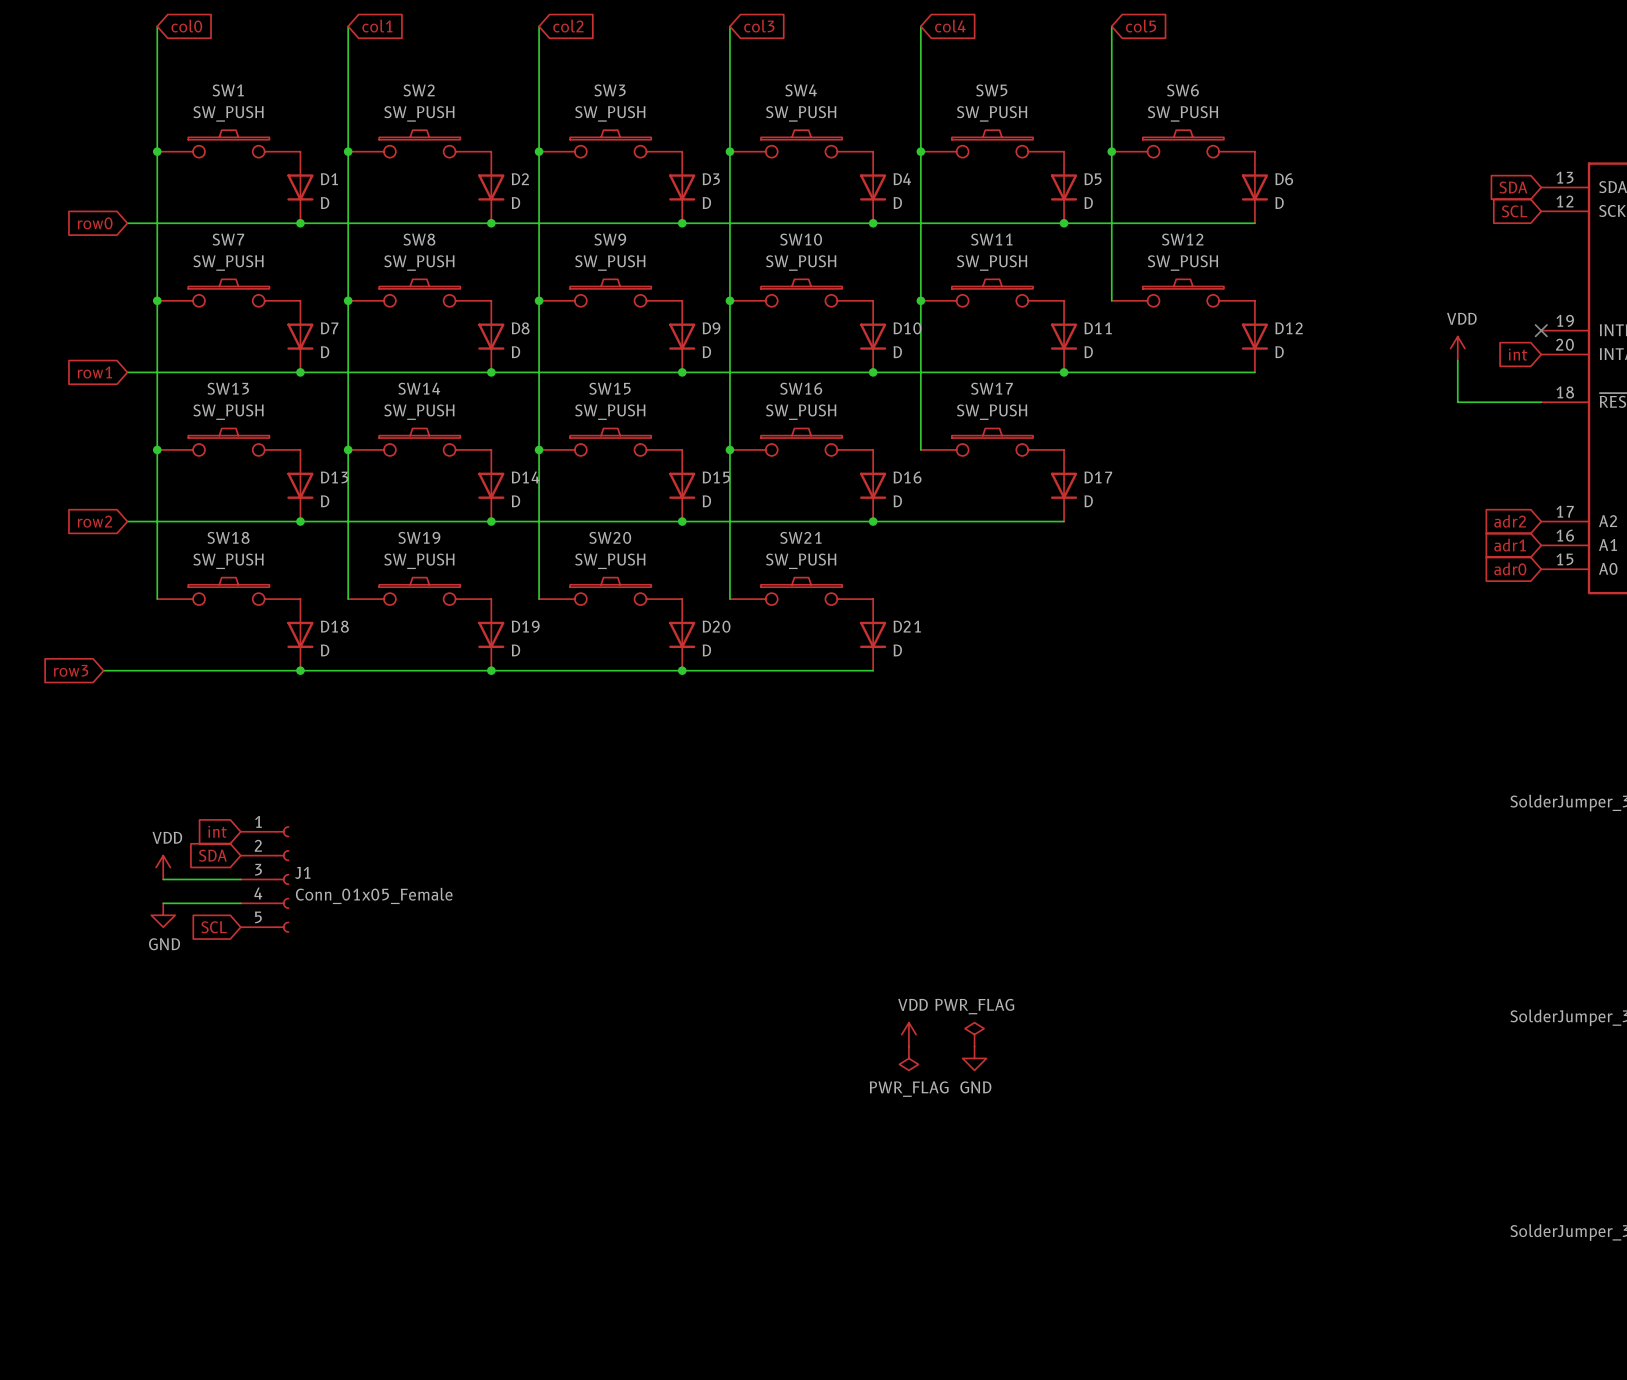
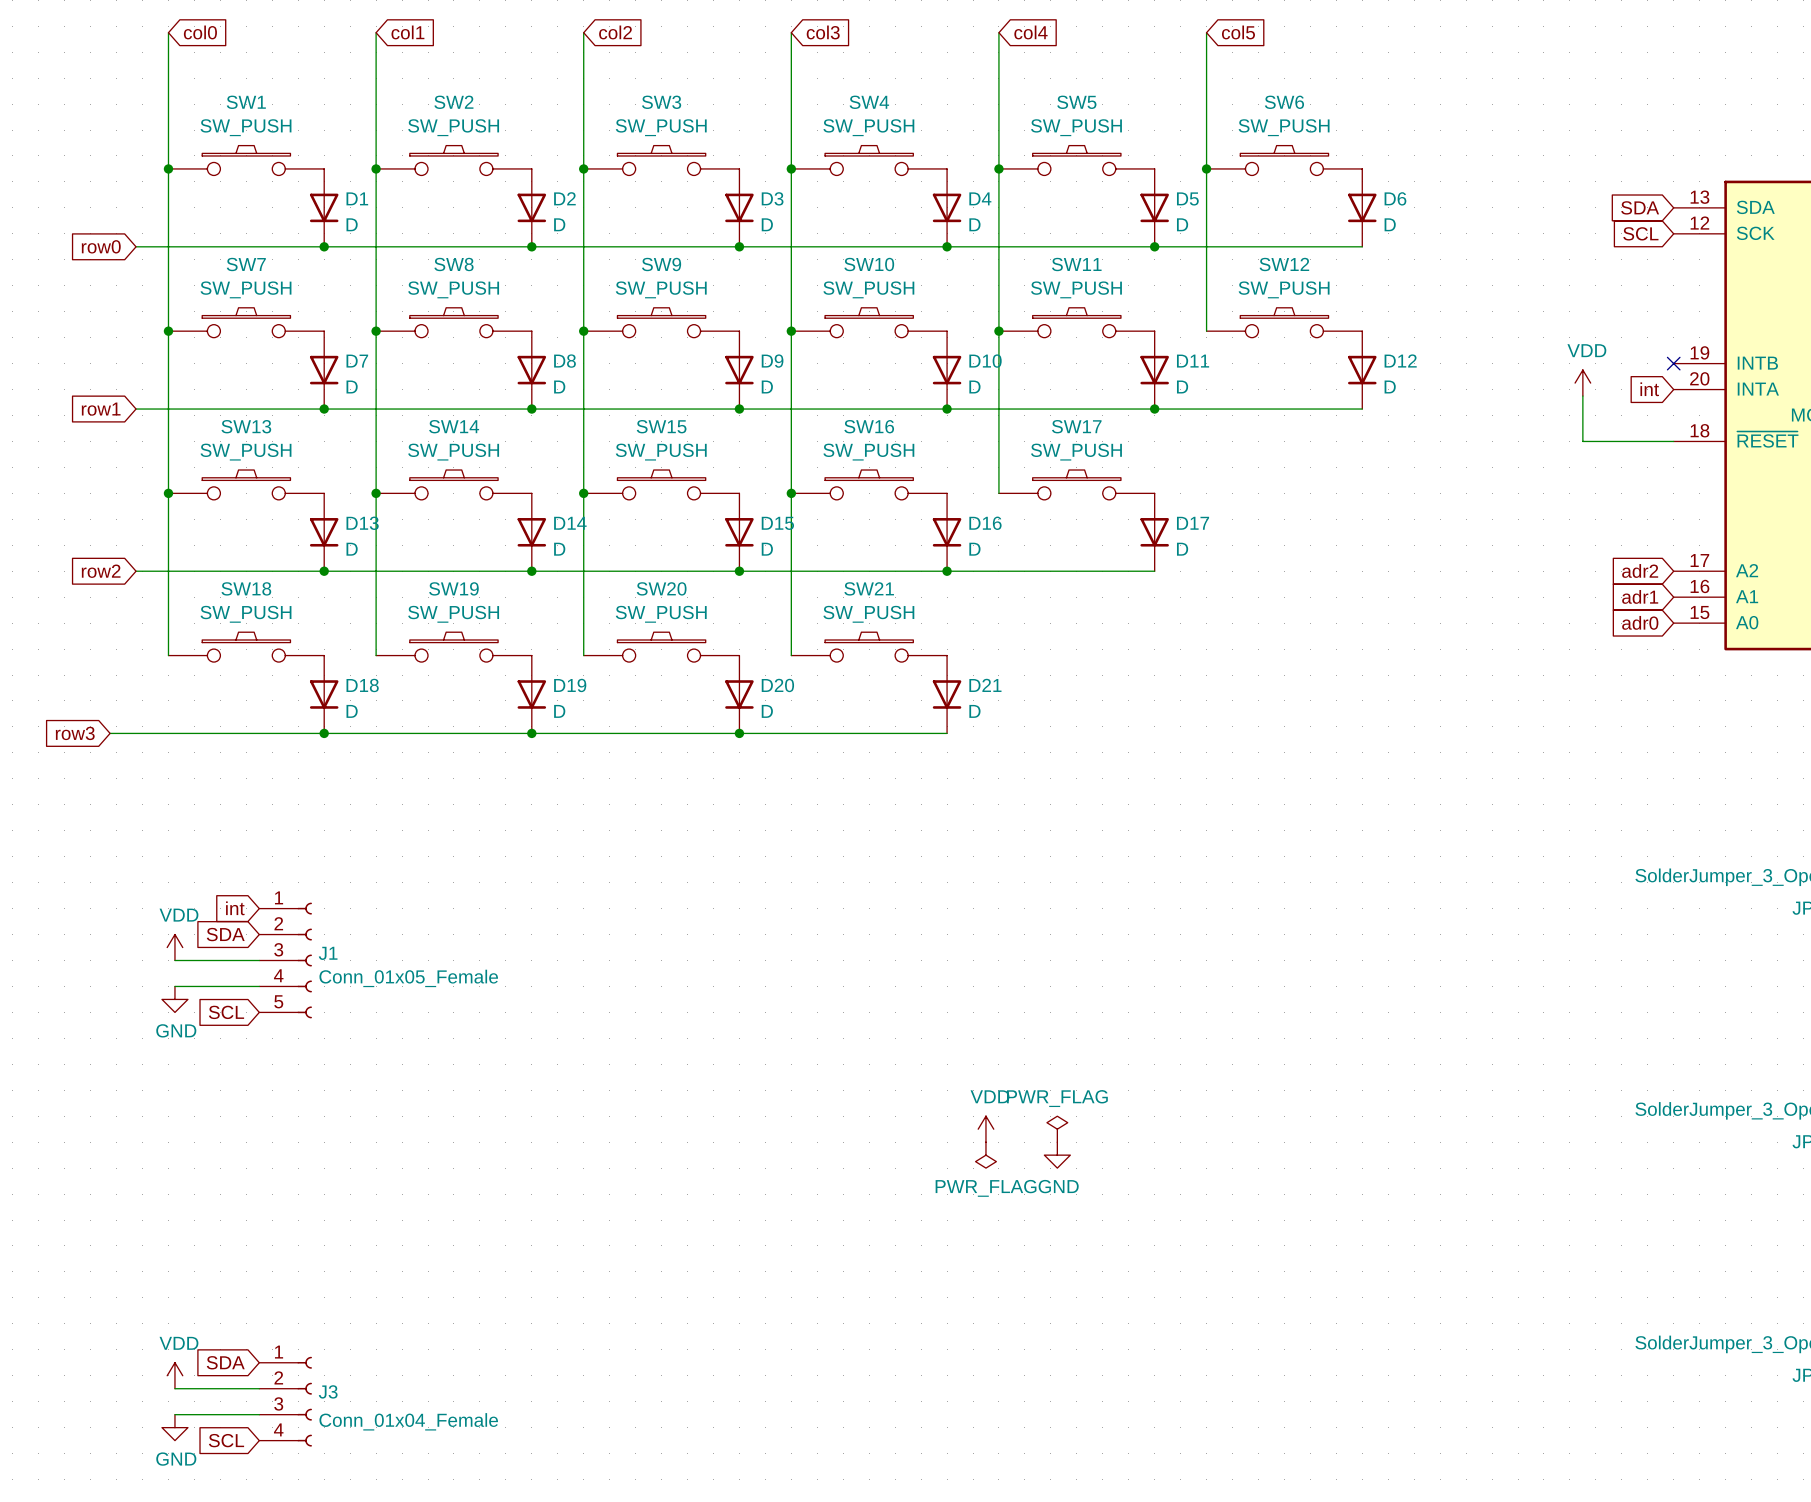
global label: none -> SDA (225, 1362)
power symbol: none -> VDD (174, 1375)
wire: none -> (174, 1388) (259, 1388)
J3: none -> Conn_01x04_Female (285, 1401)
wire: none -> (174, 1414) (259, 1414)
power symbol: none -> GND (174, 1427)
global label: none -> SCL (226, 1440)

